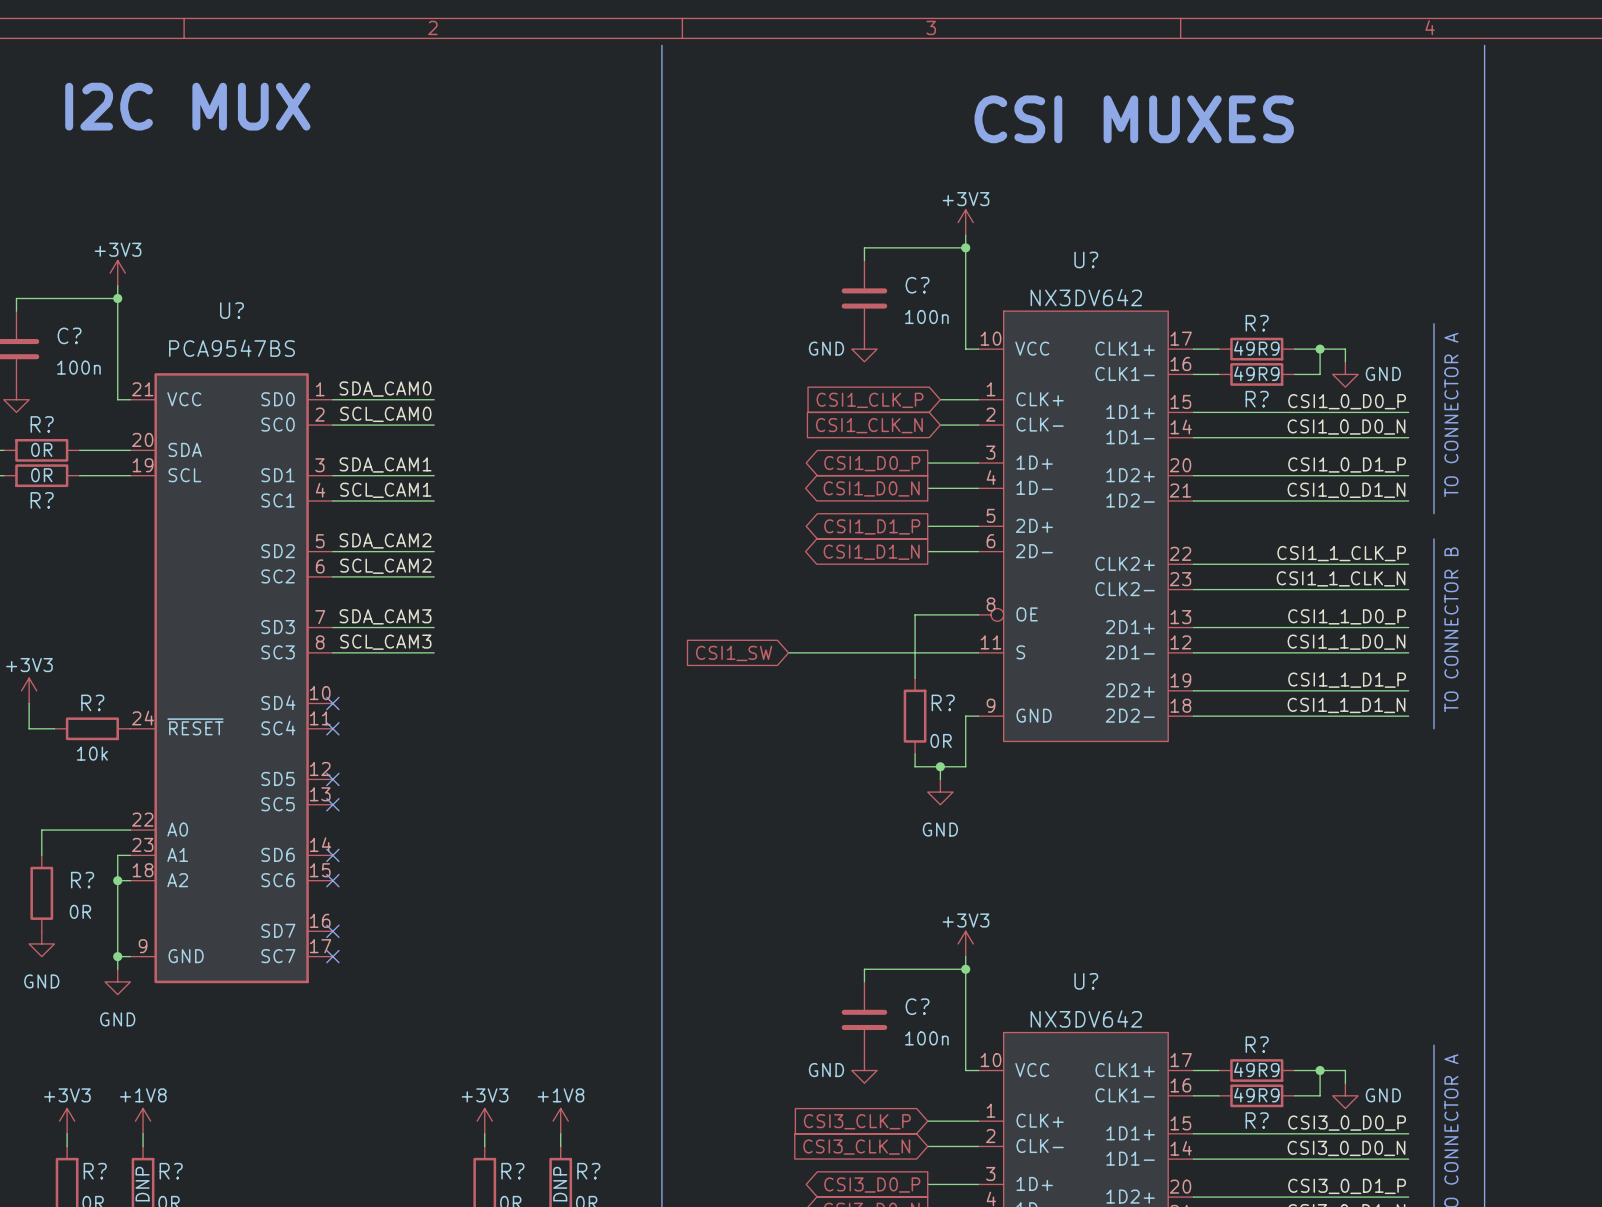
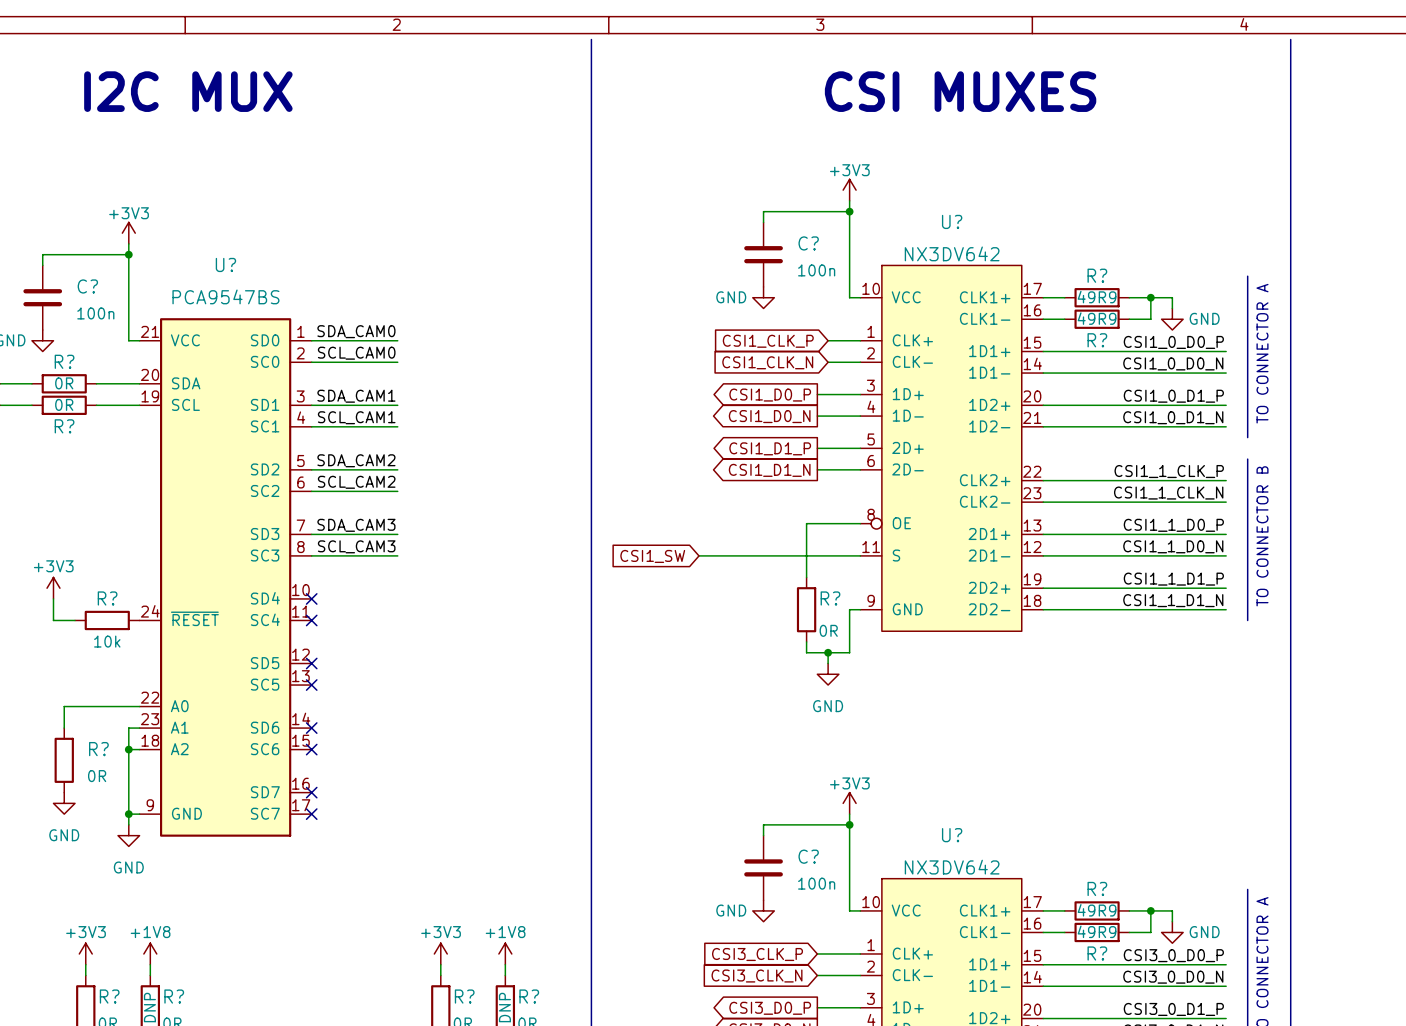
text position: CSI MUXES (1134, 119) -> CSI MUXES (960, 91)

